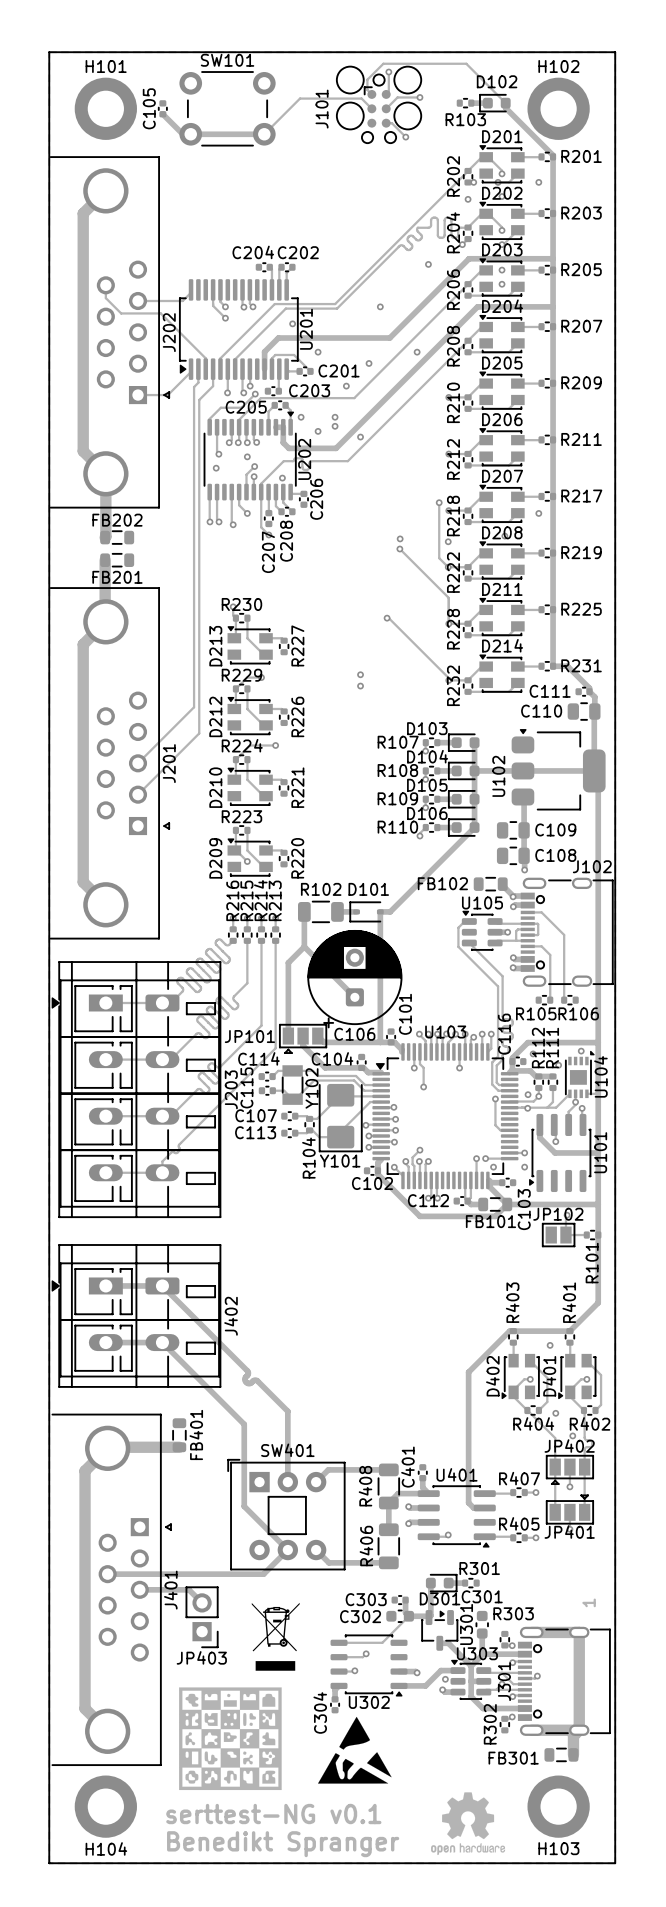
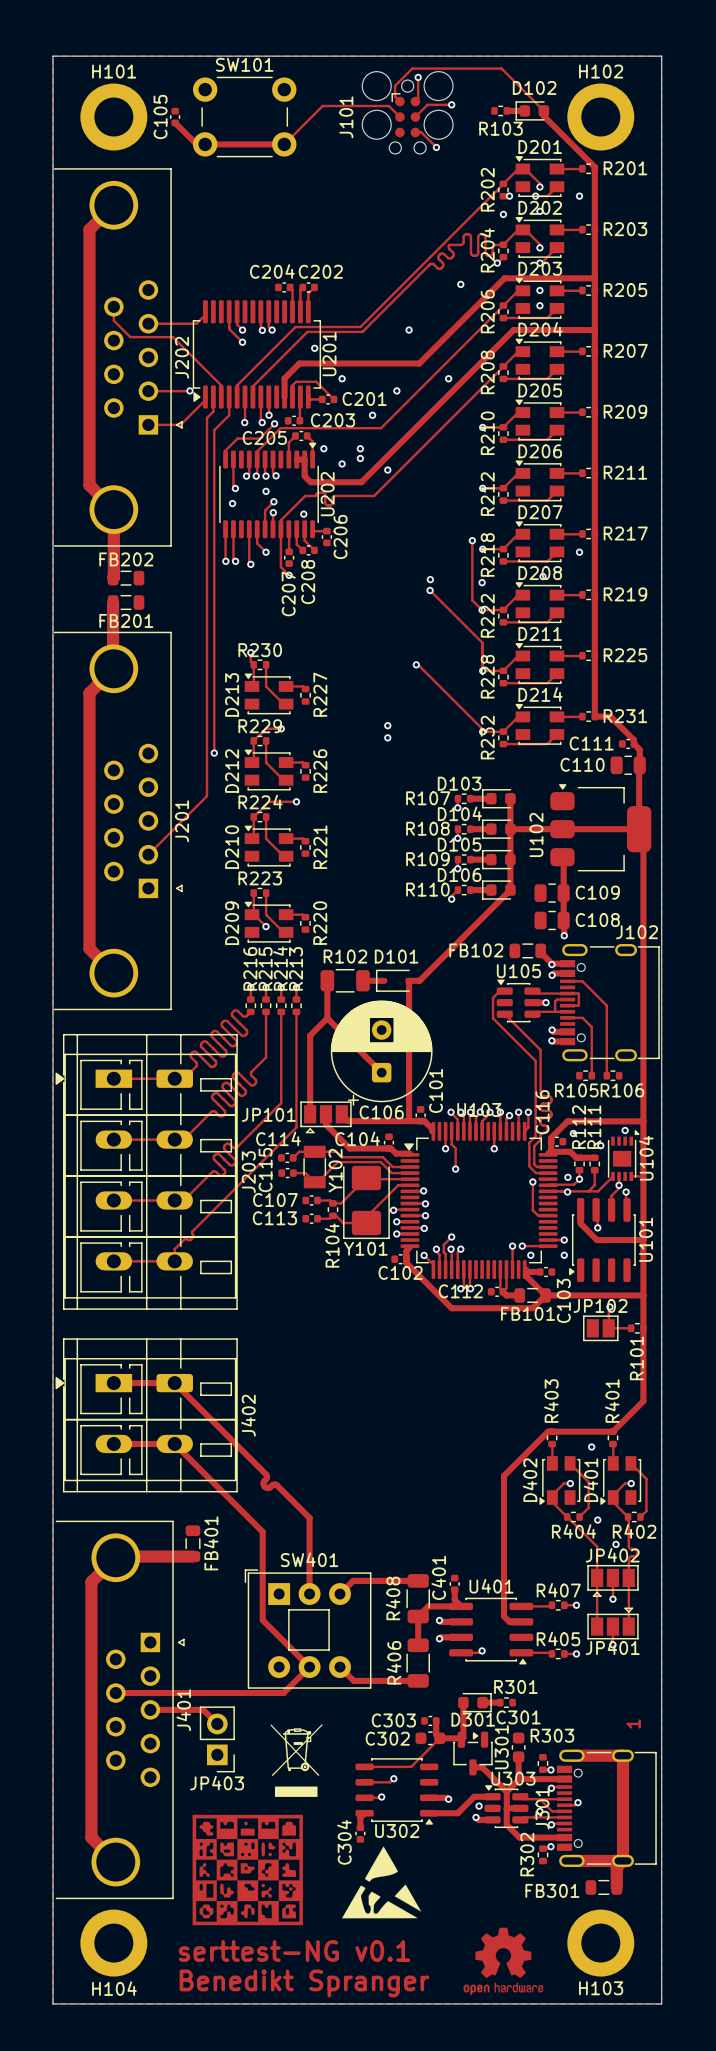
track: none -> (189, 390) (148, 391)
via: none -> (189, 390)
track: (194, 387) (194, 707) (138, 763) -> (208, 416) (206, 418) (206, 796)
track: (199, 700) (199, 733) (192, 740) -> none
via: none -> (214, 753)

